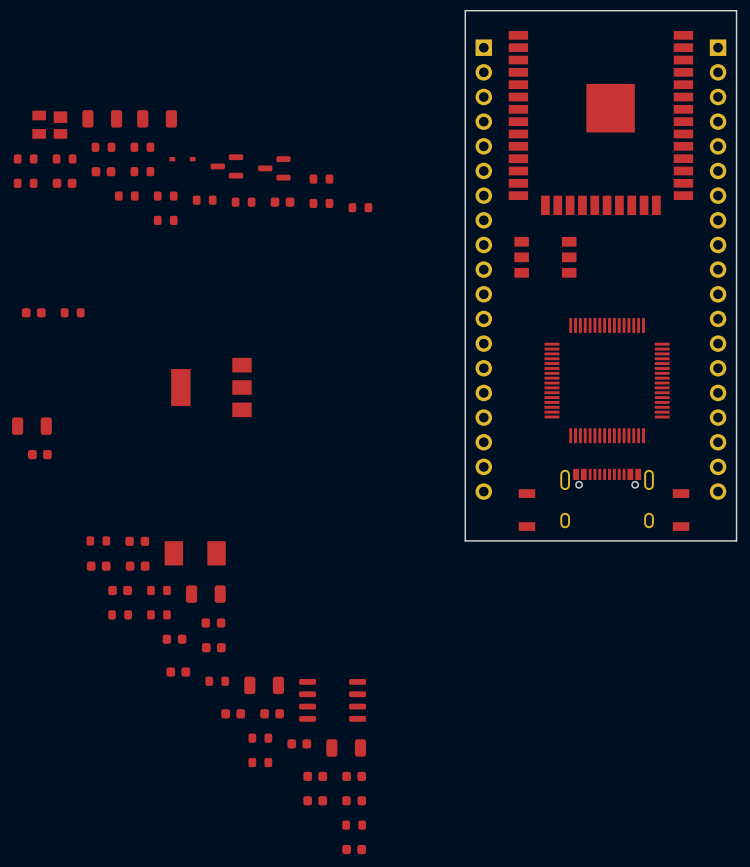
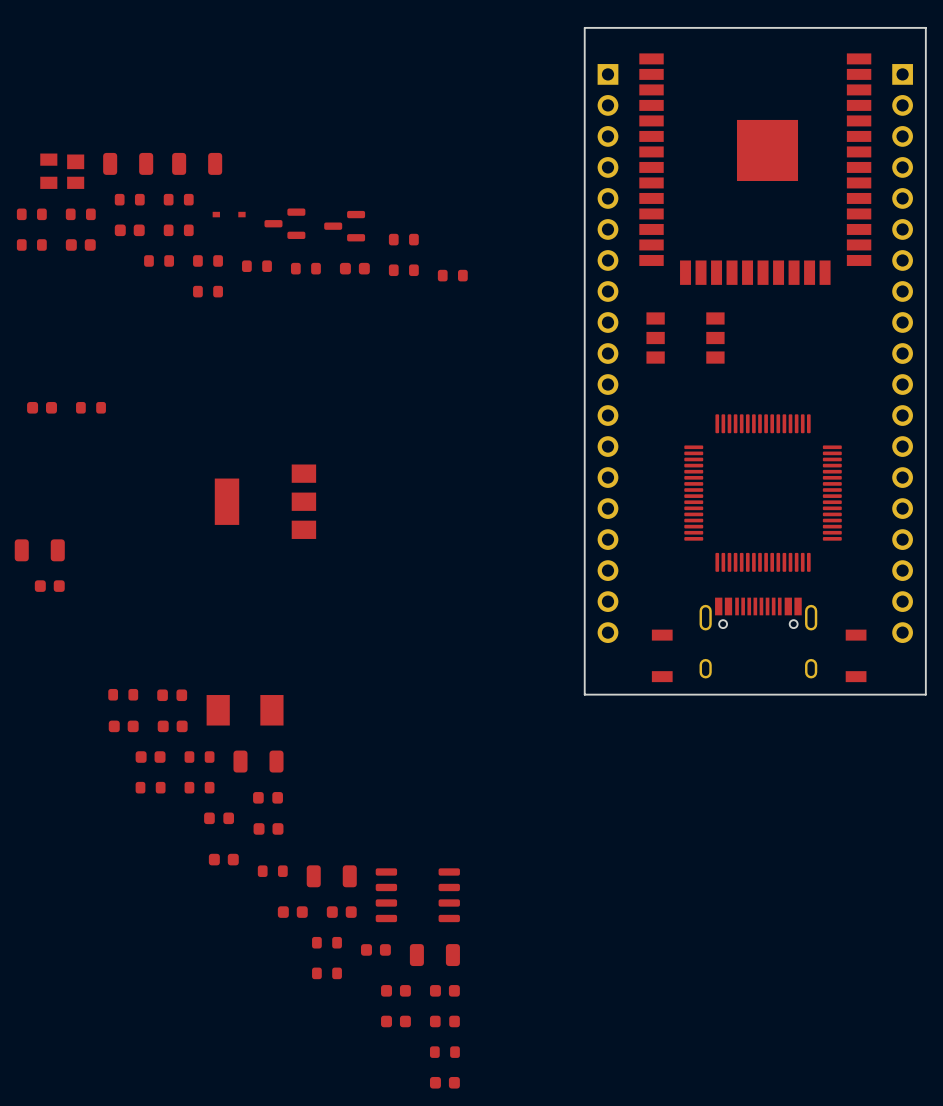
part footprint: [560, 468, 654, 529] -> [699, 597, 818, 679]

